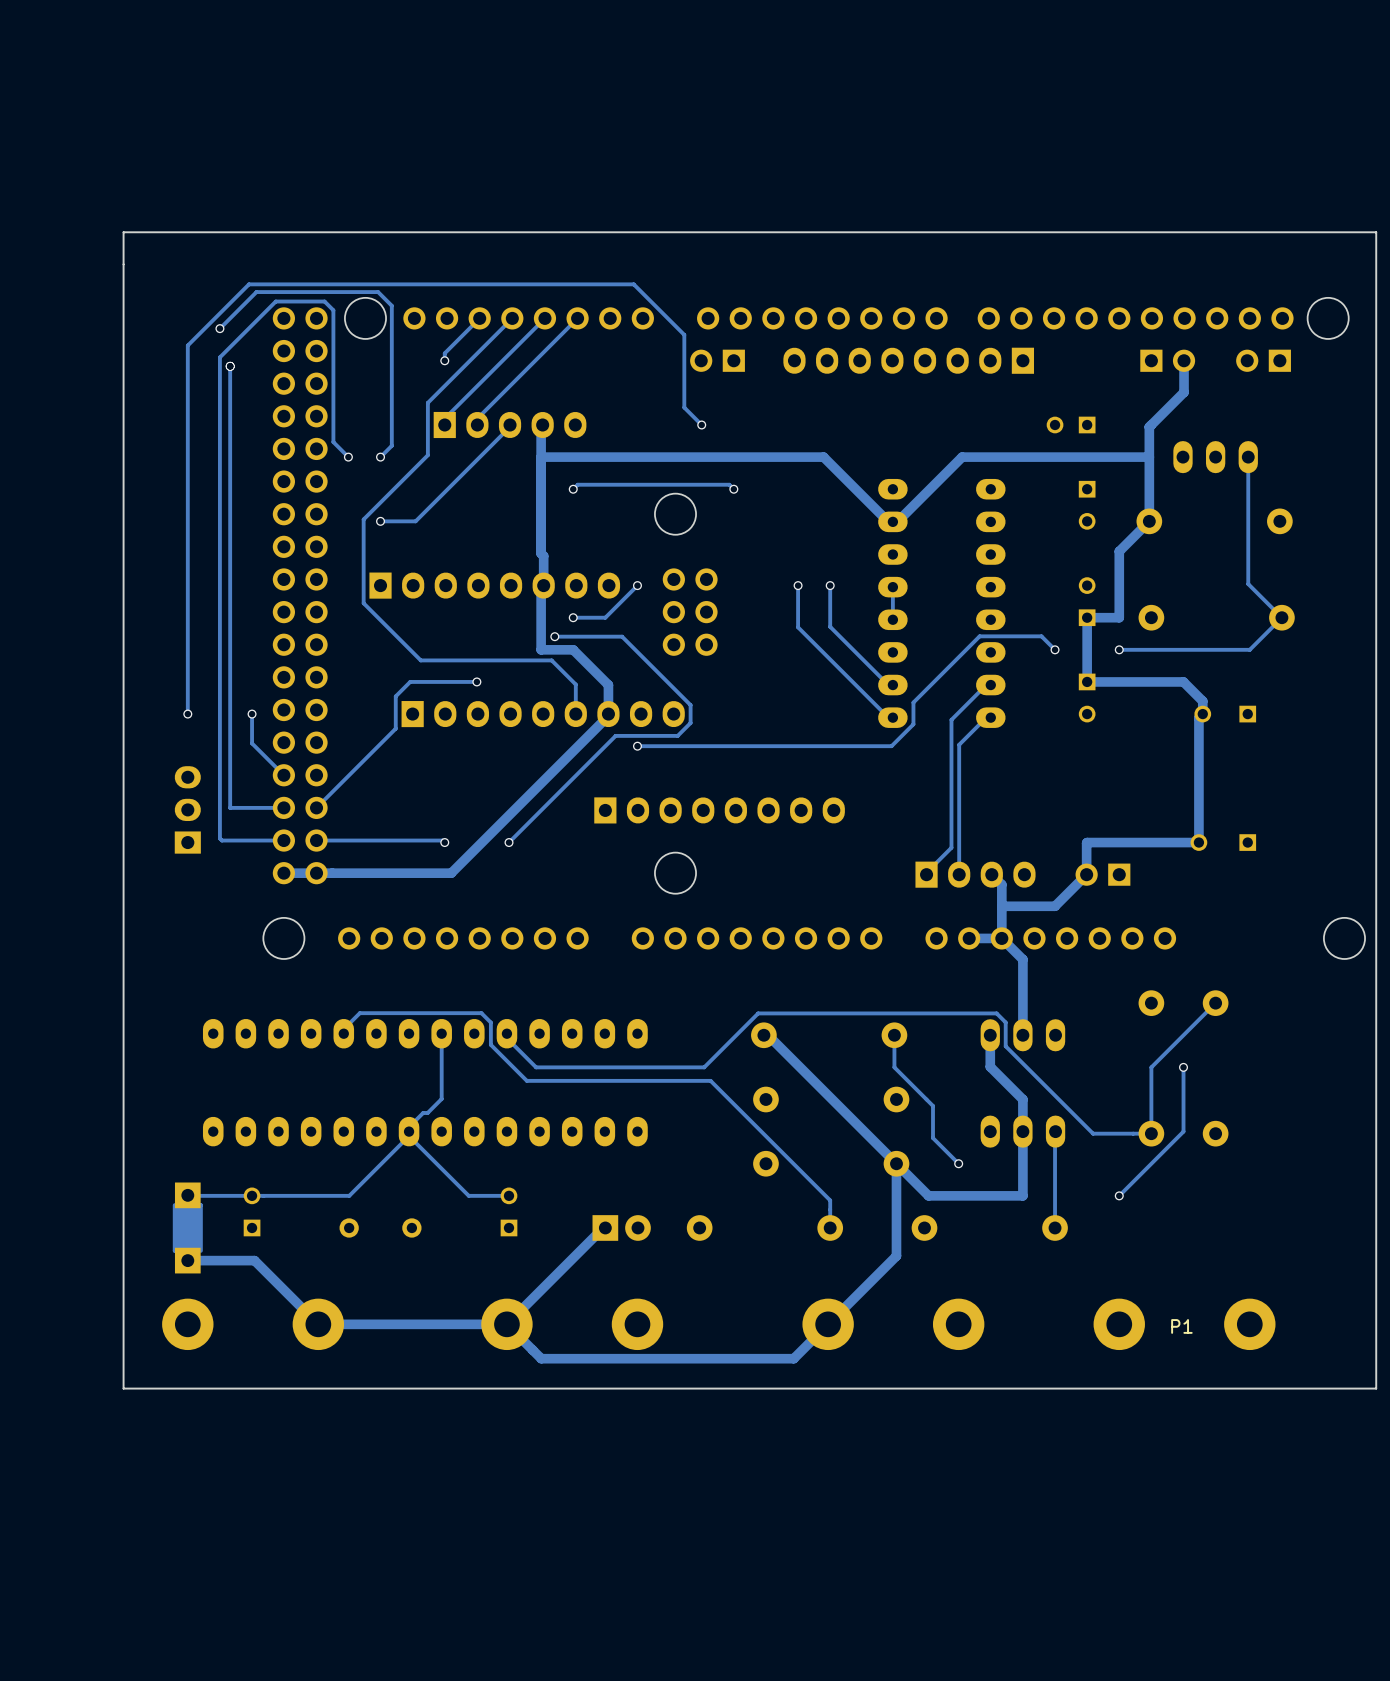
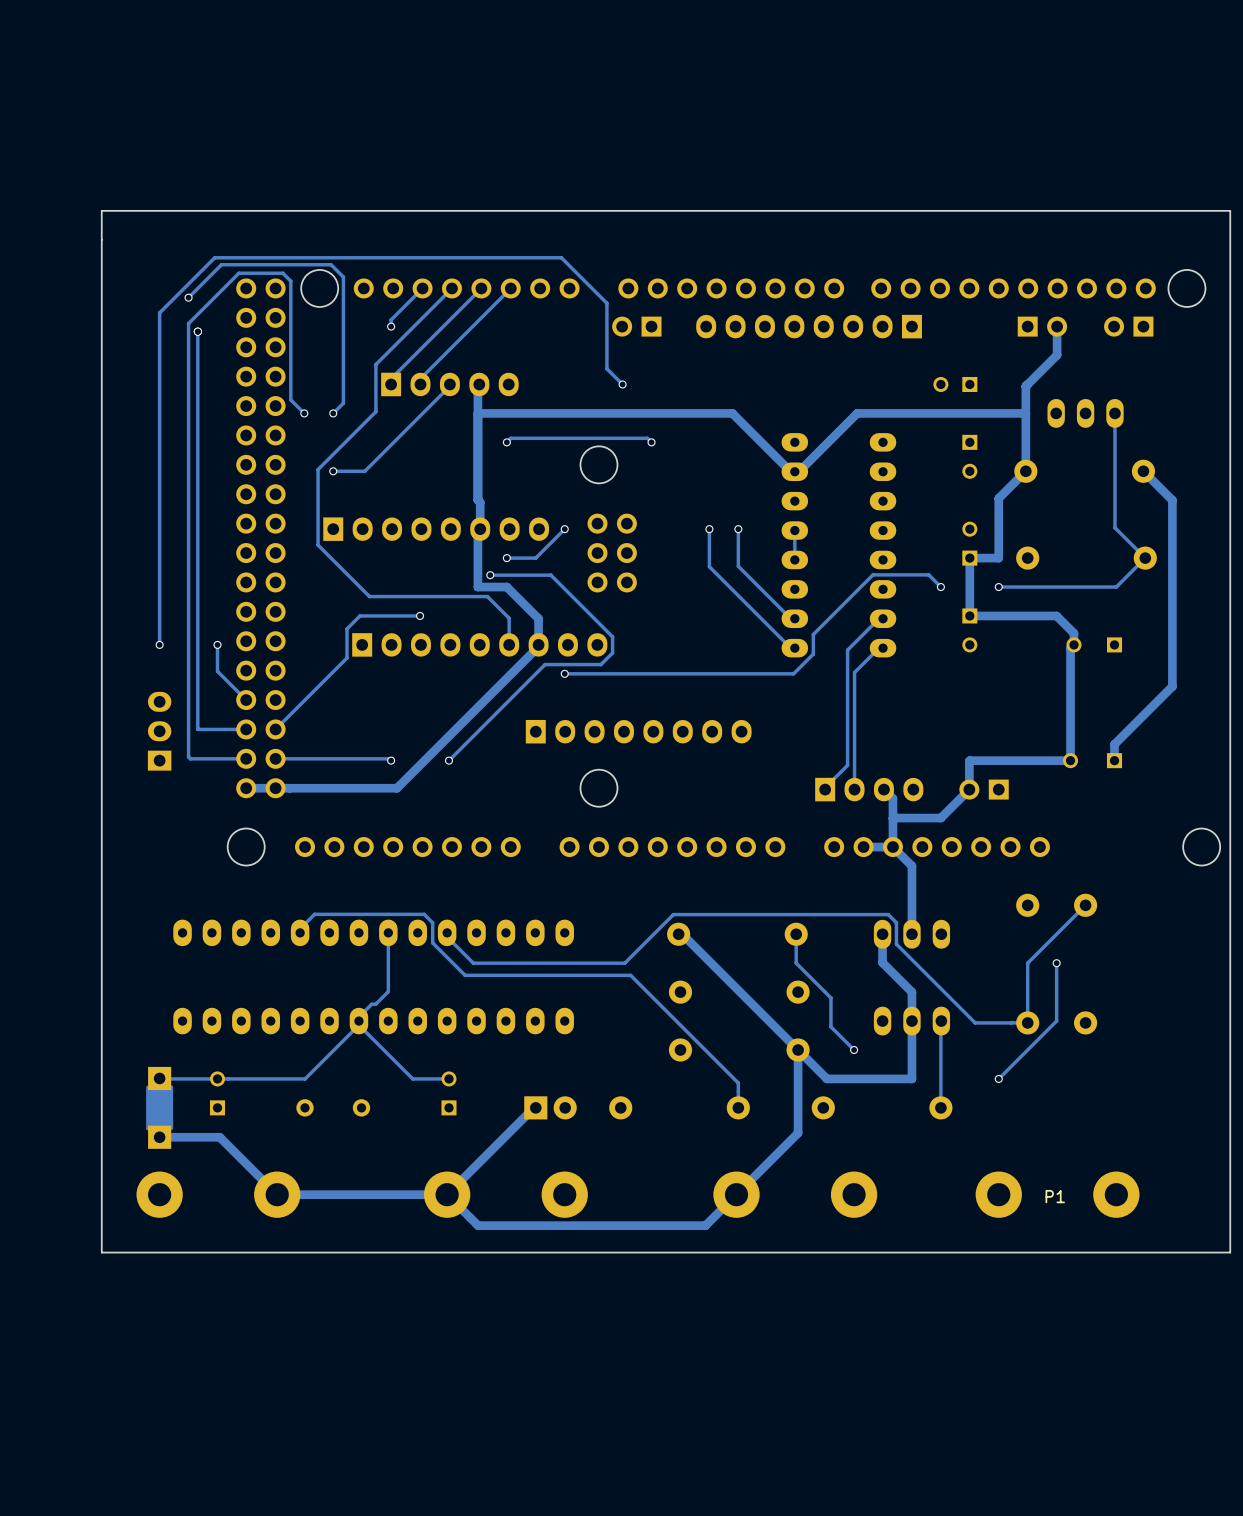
track: none -> (1143, 471) (1172, 500) (1172, 686) (1114, 744) (1114, 760)

